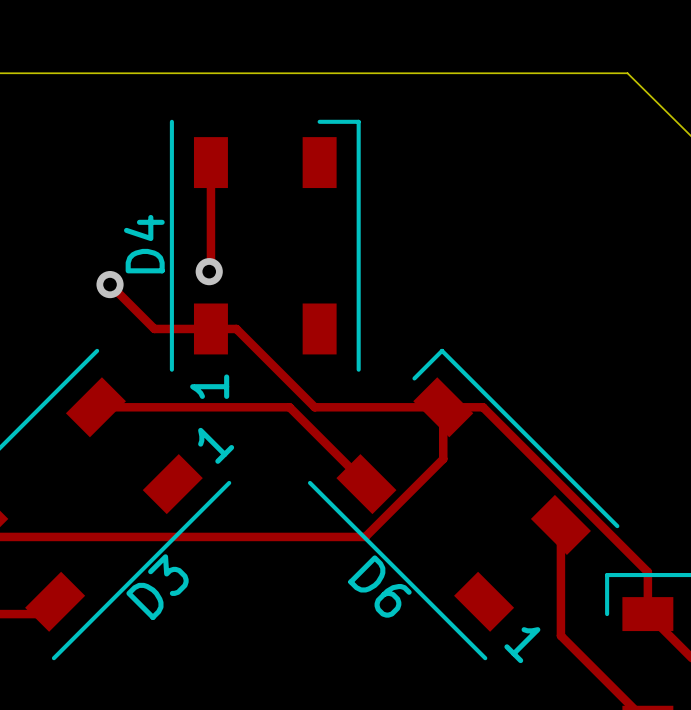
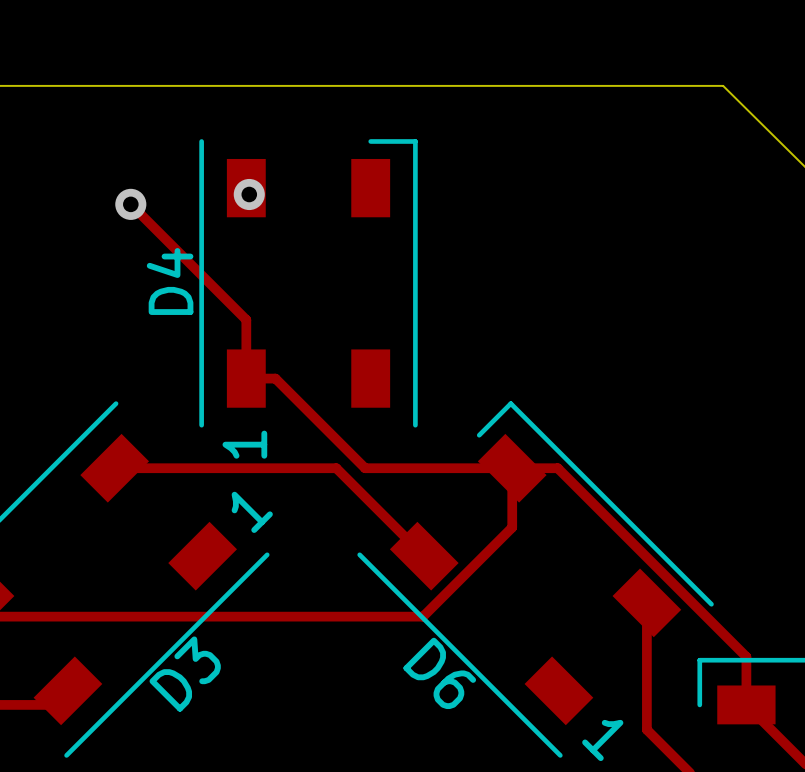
track: (210, 162) (210, 269) (209, 271) -> none
via: none -> (249, 194)
via: none -> (130, 204)
via: (209, 271) -> none
track: (110, 284) (154, 328) (210, 328) -> (130, 204) (246, 319) (246, 378)
via: (110, 284) -> none

